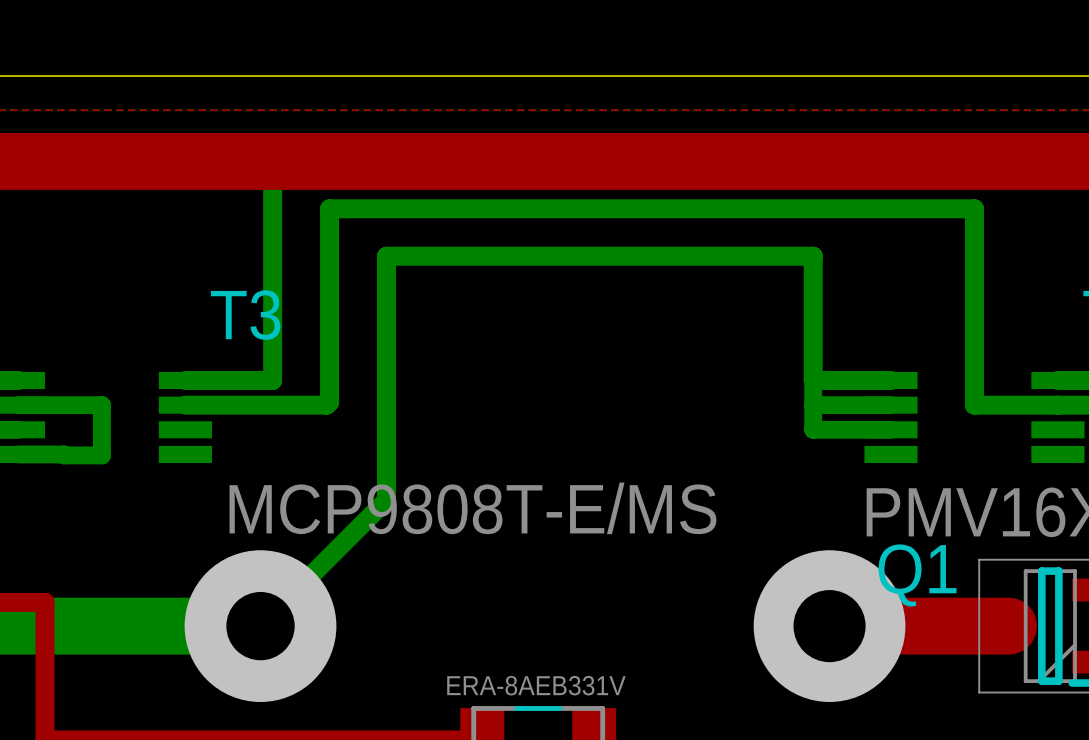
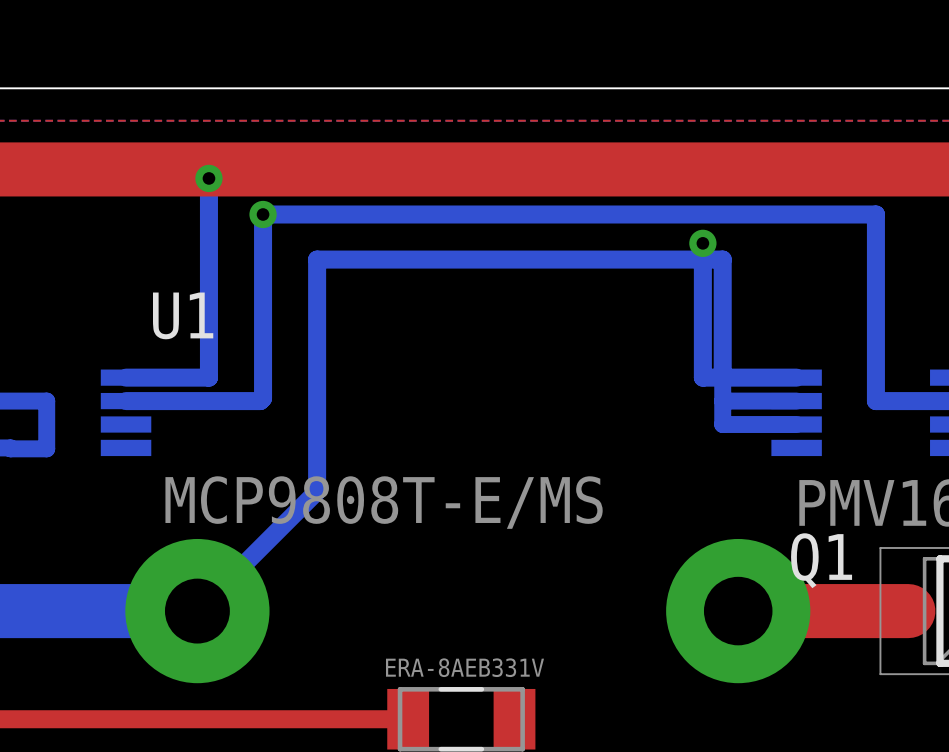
via: none -> (208, 178)
via: none -> (263, 214)
bottom track: none -> (702, 243) (702, 377) (722, 377)
via: none -> (702, 243)
T3 name: T3 (245, 315) -> U1 (183, 315)

